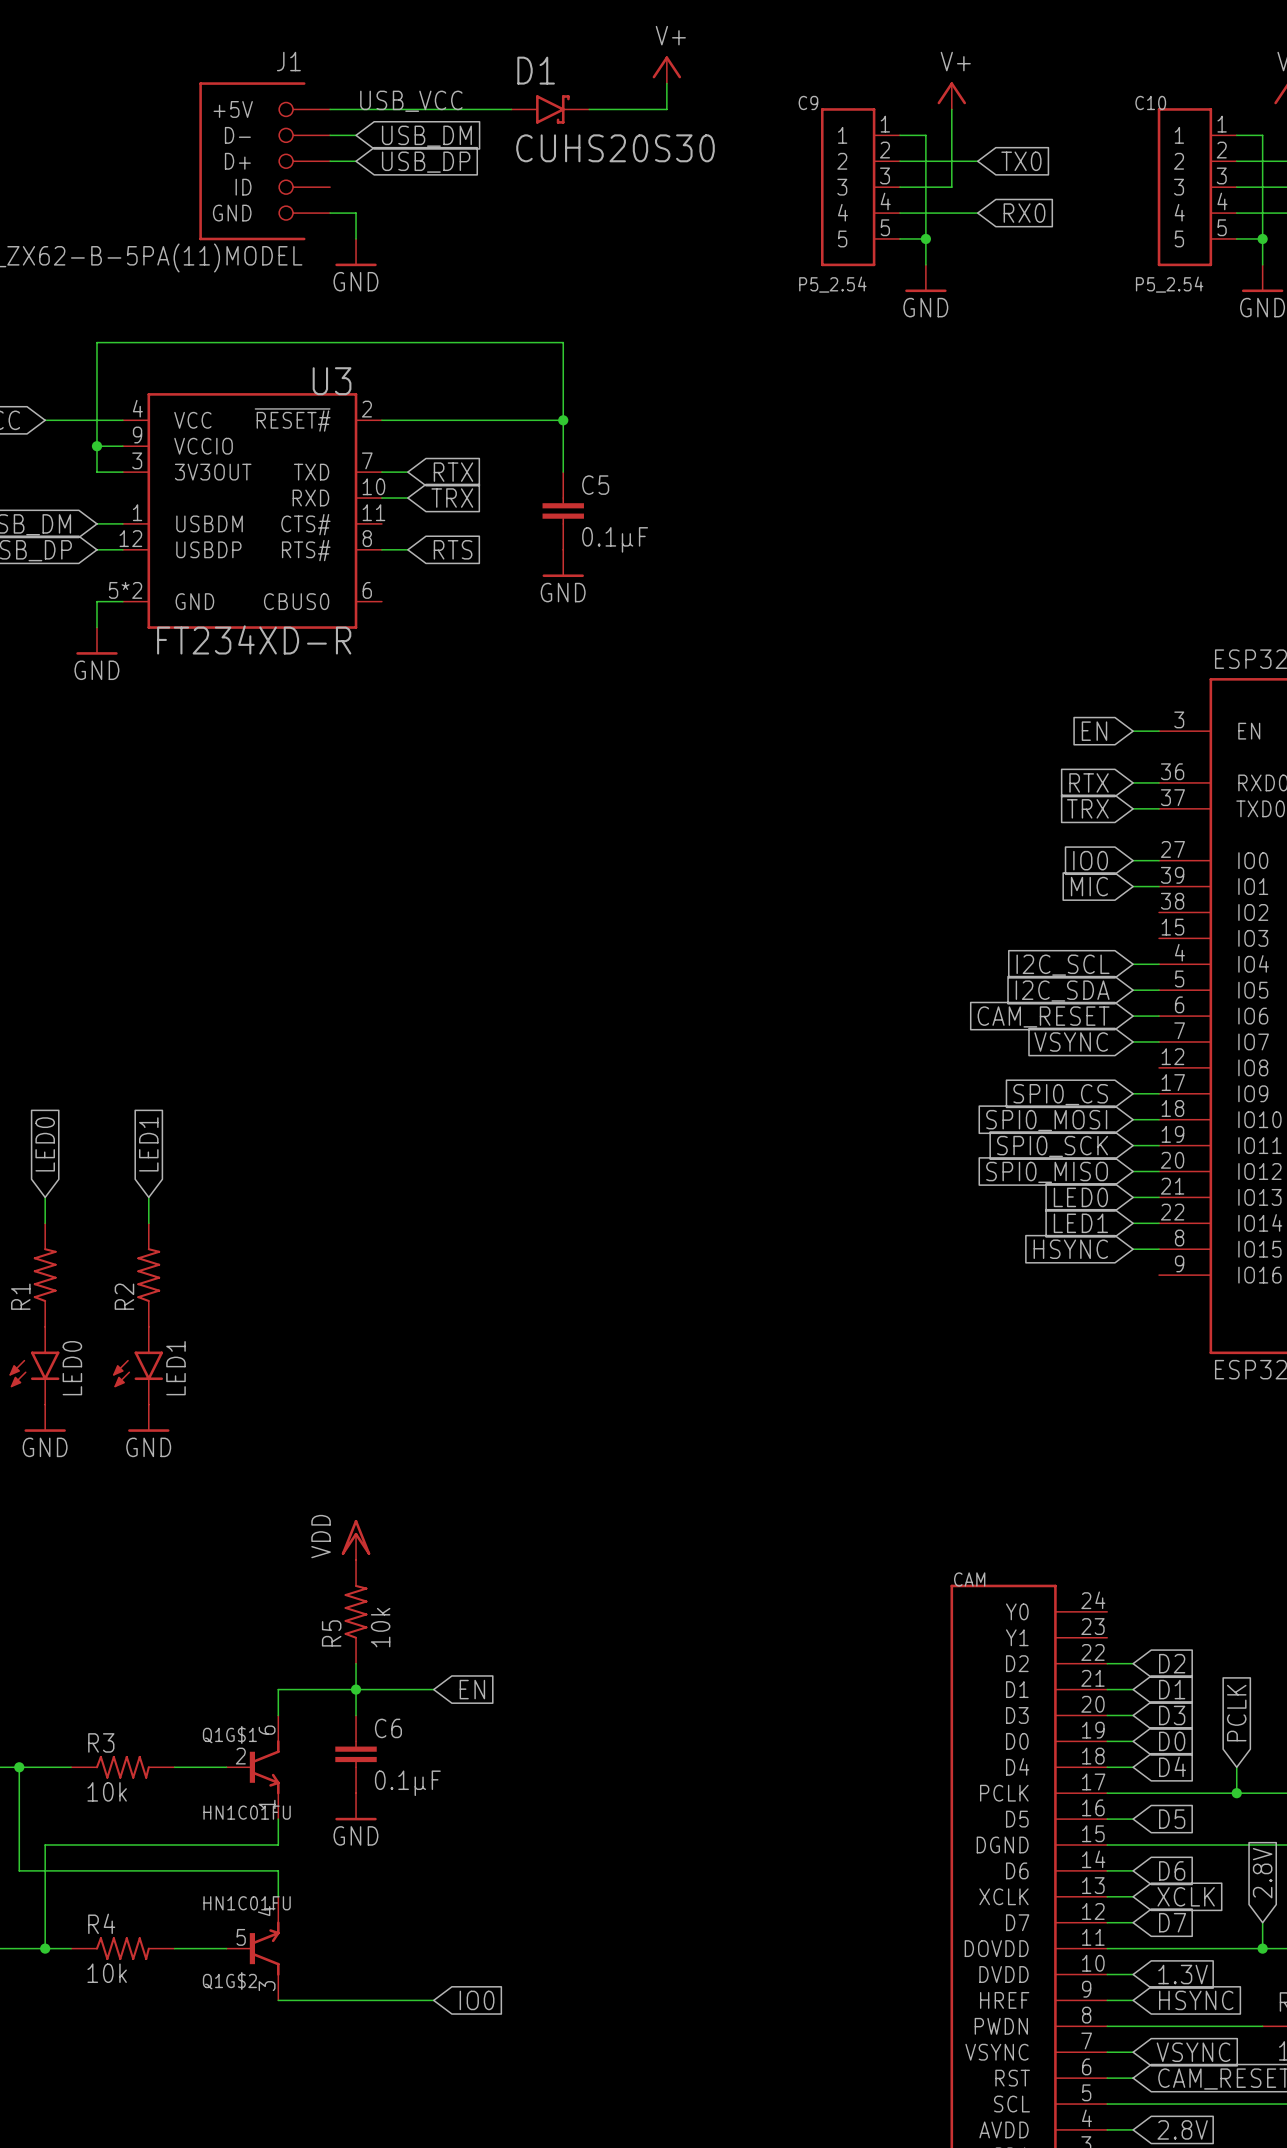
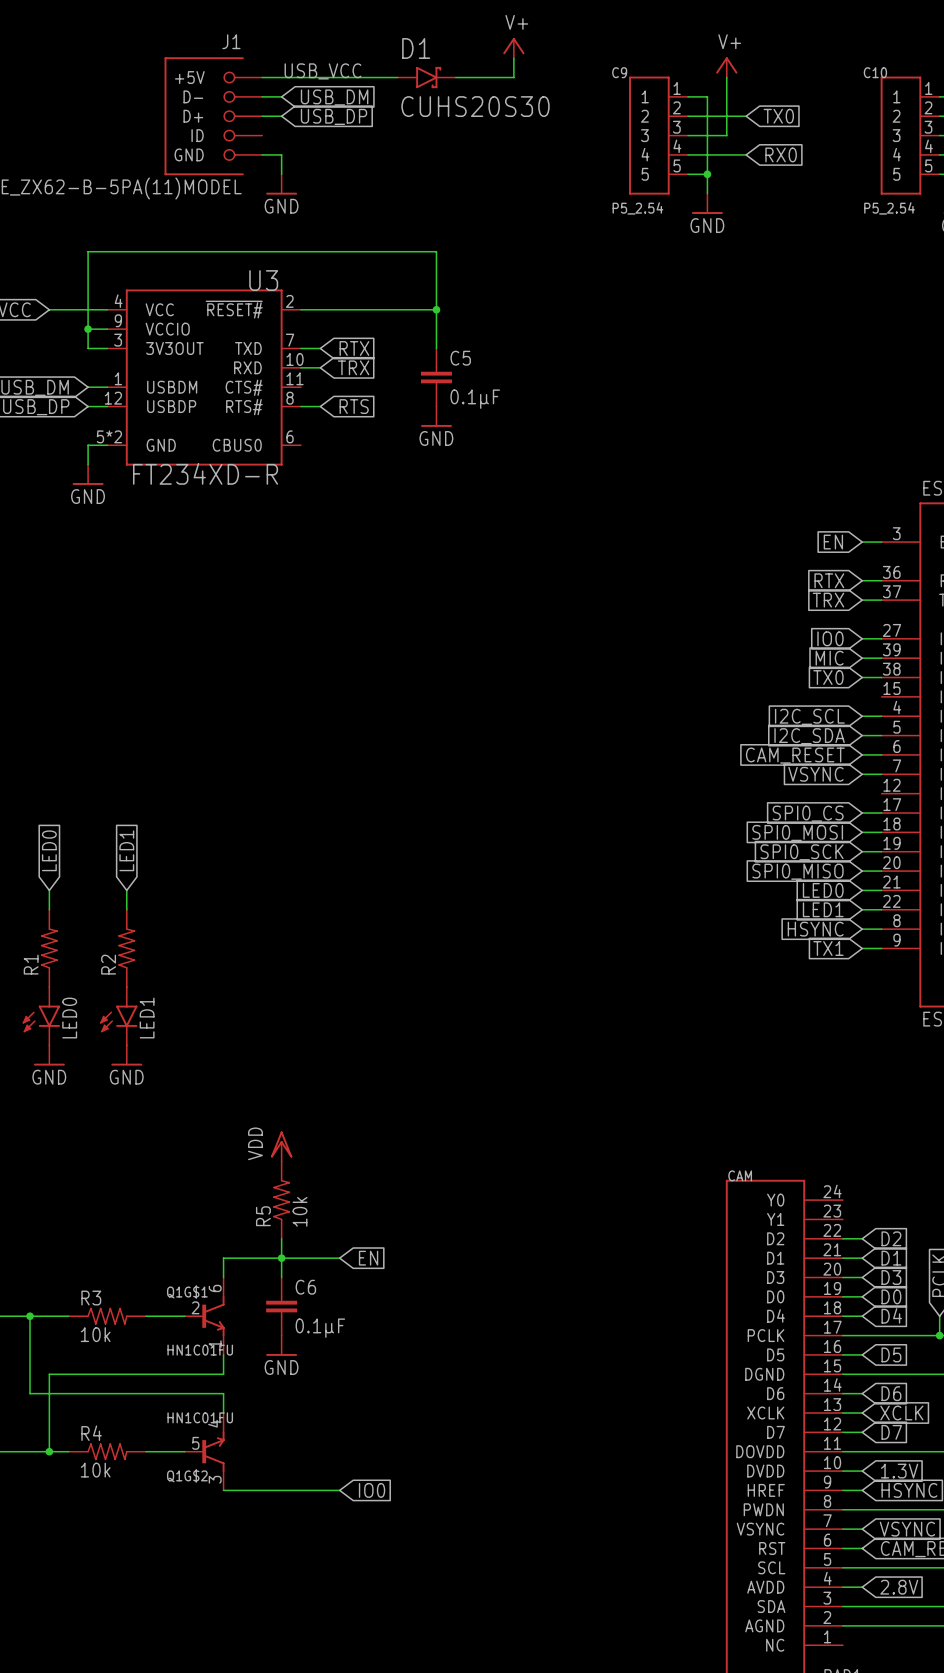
global label: none -> TX0 (828, 677)
wire: none -> (862, 677) (881, 677)
global label: none -> TX1 (828, 948)
wire: none -> (862, 948) (881, 948)

